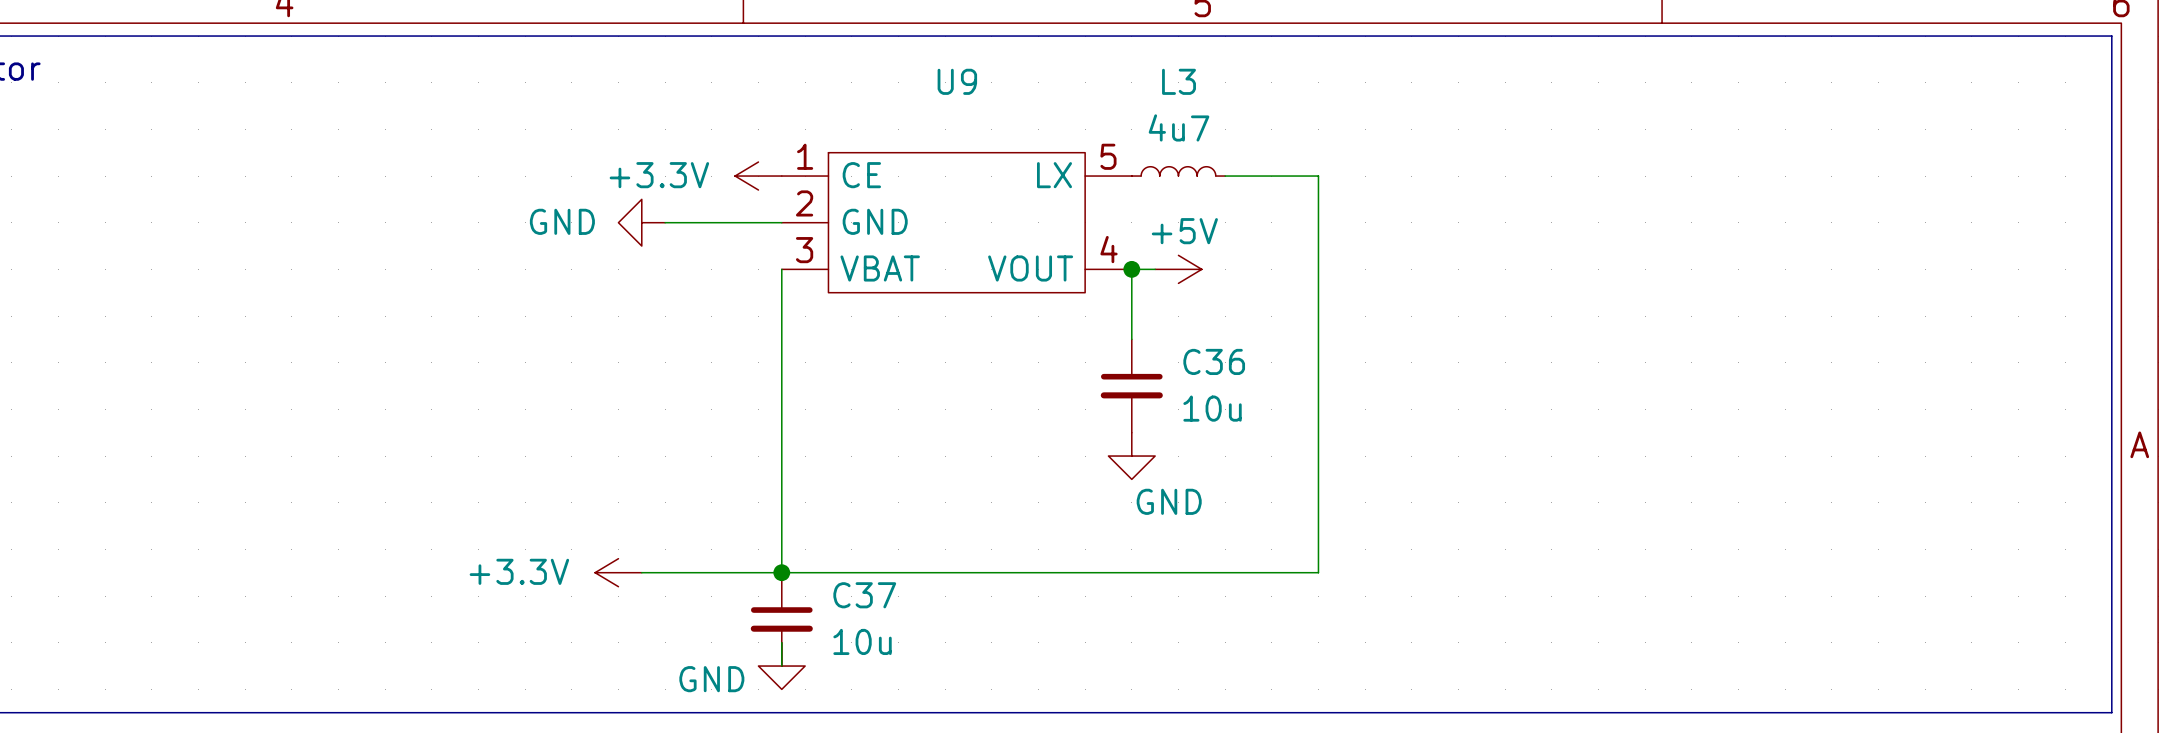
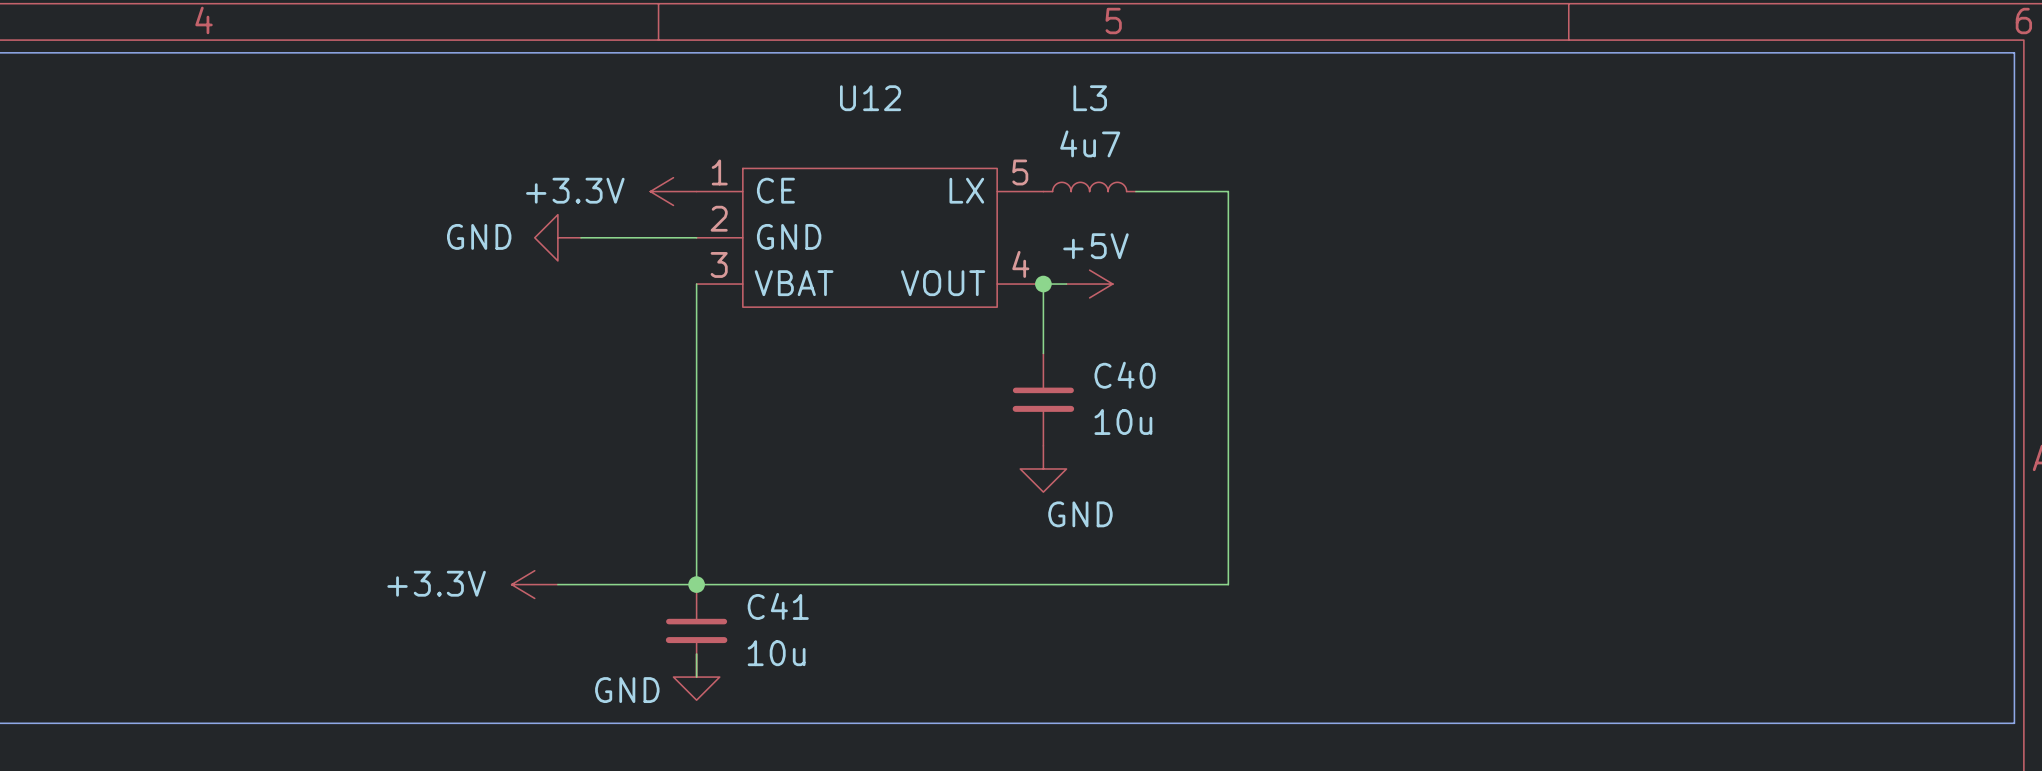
U9 name: U9 (957, 81) -> U12 (870, 98)
C36 name: C36 (1214, 361) -> C40 (1125, 375)
C37 name: C37 (864, 595) -> C41 (778, 606)

